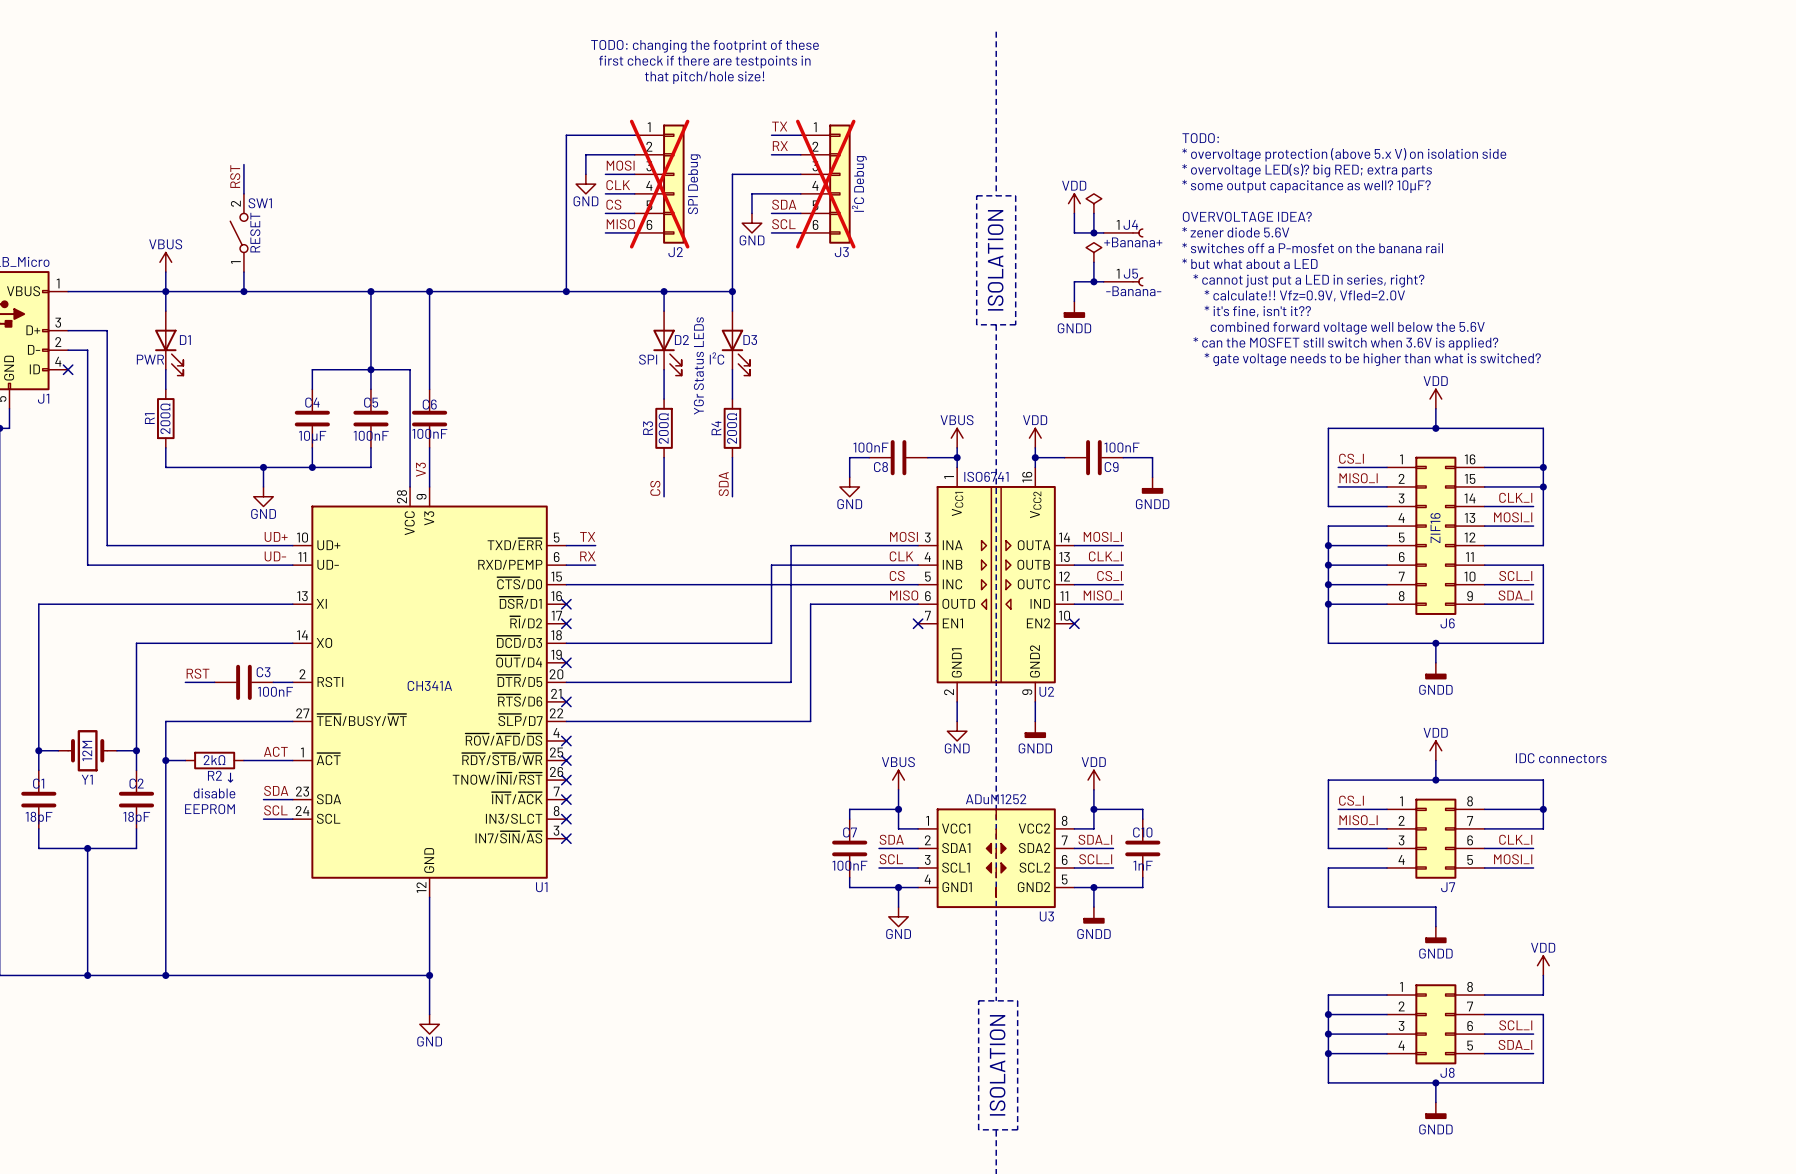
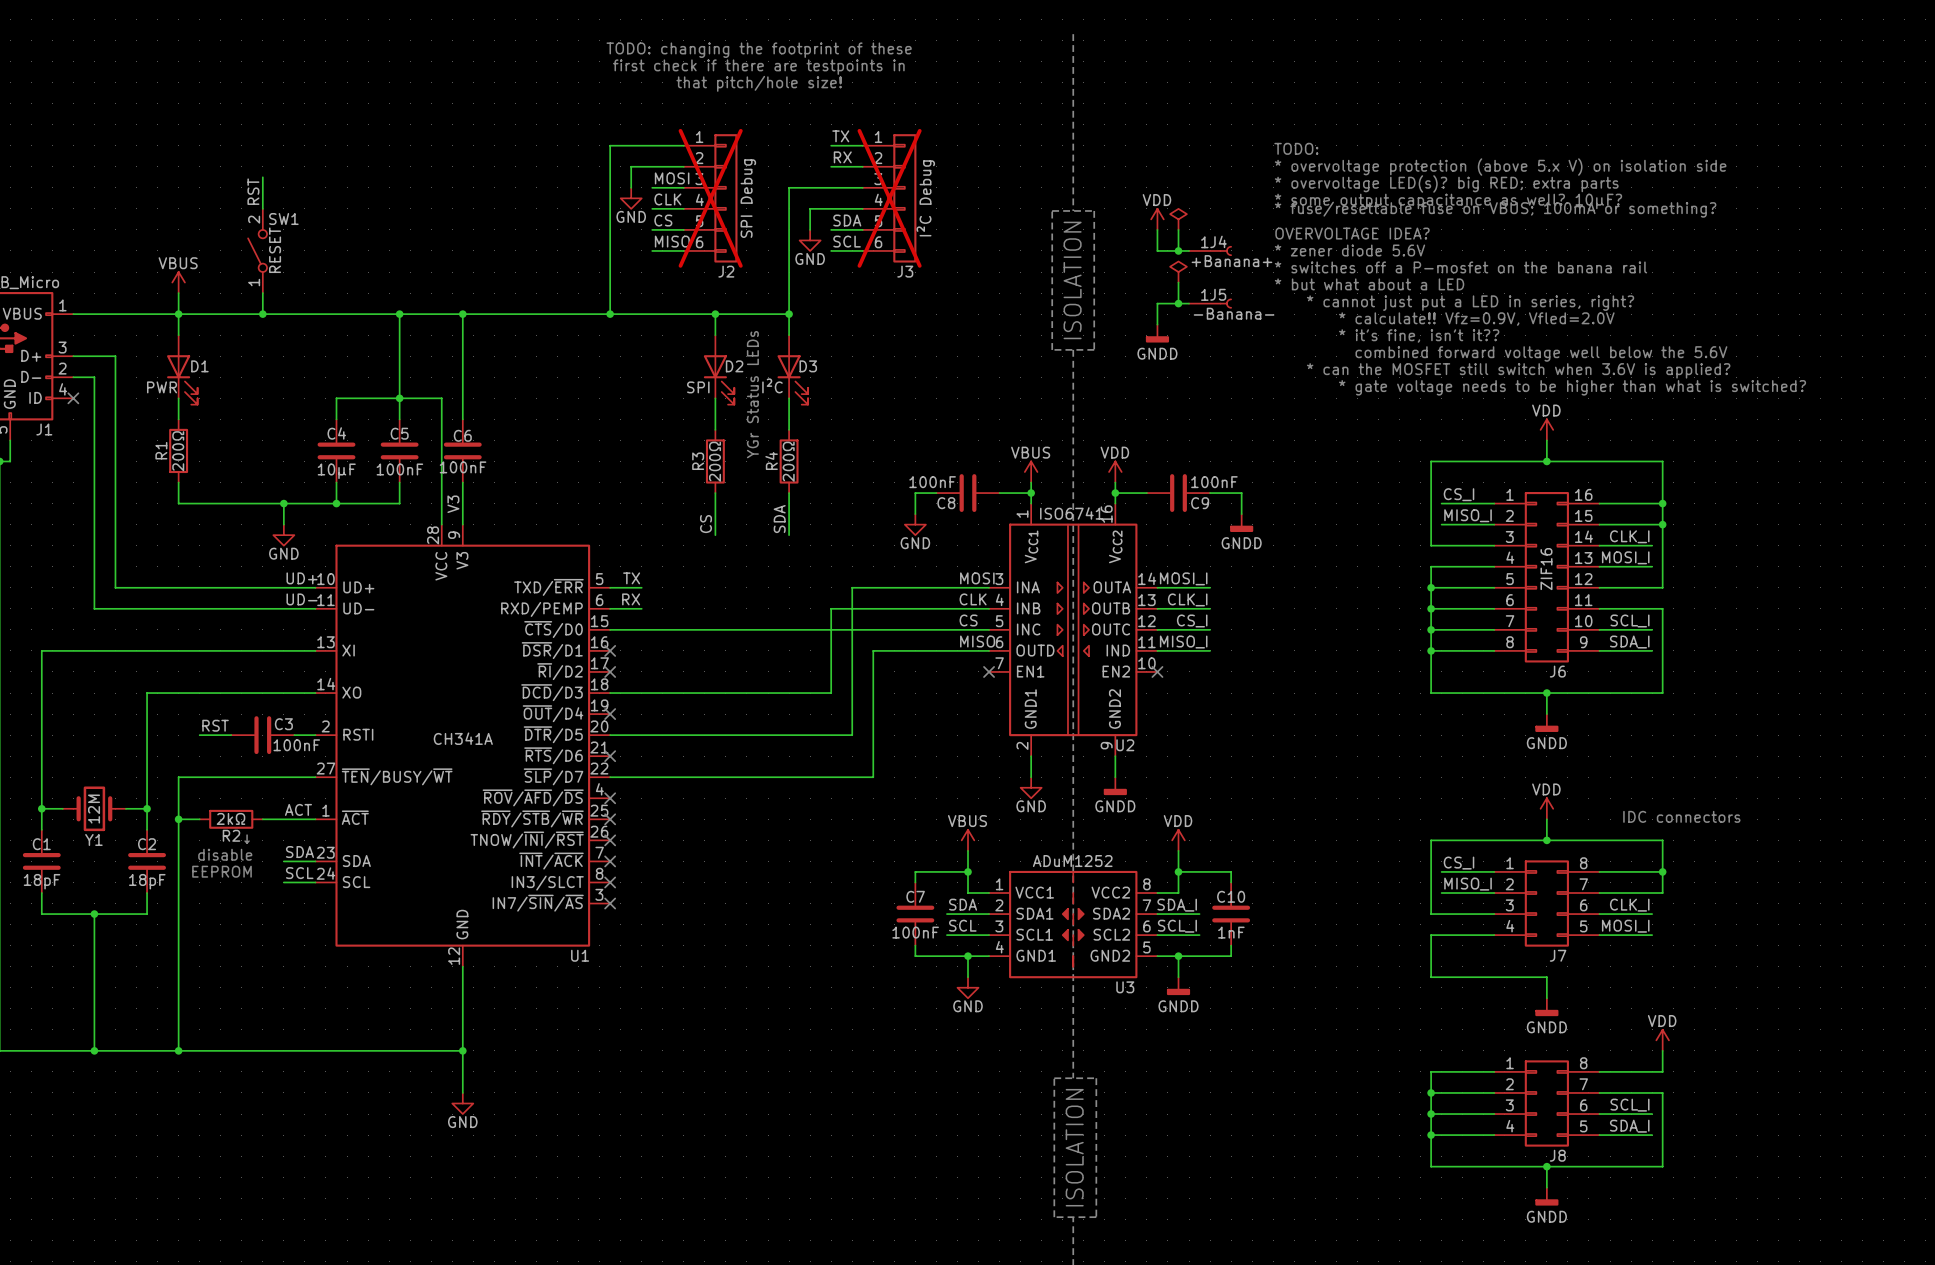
text: none -> * fuse/resettable fuse on VBUS; 100mA or something? (1495, 209)

